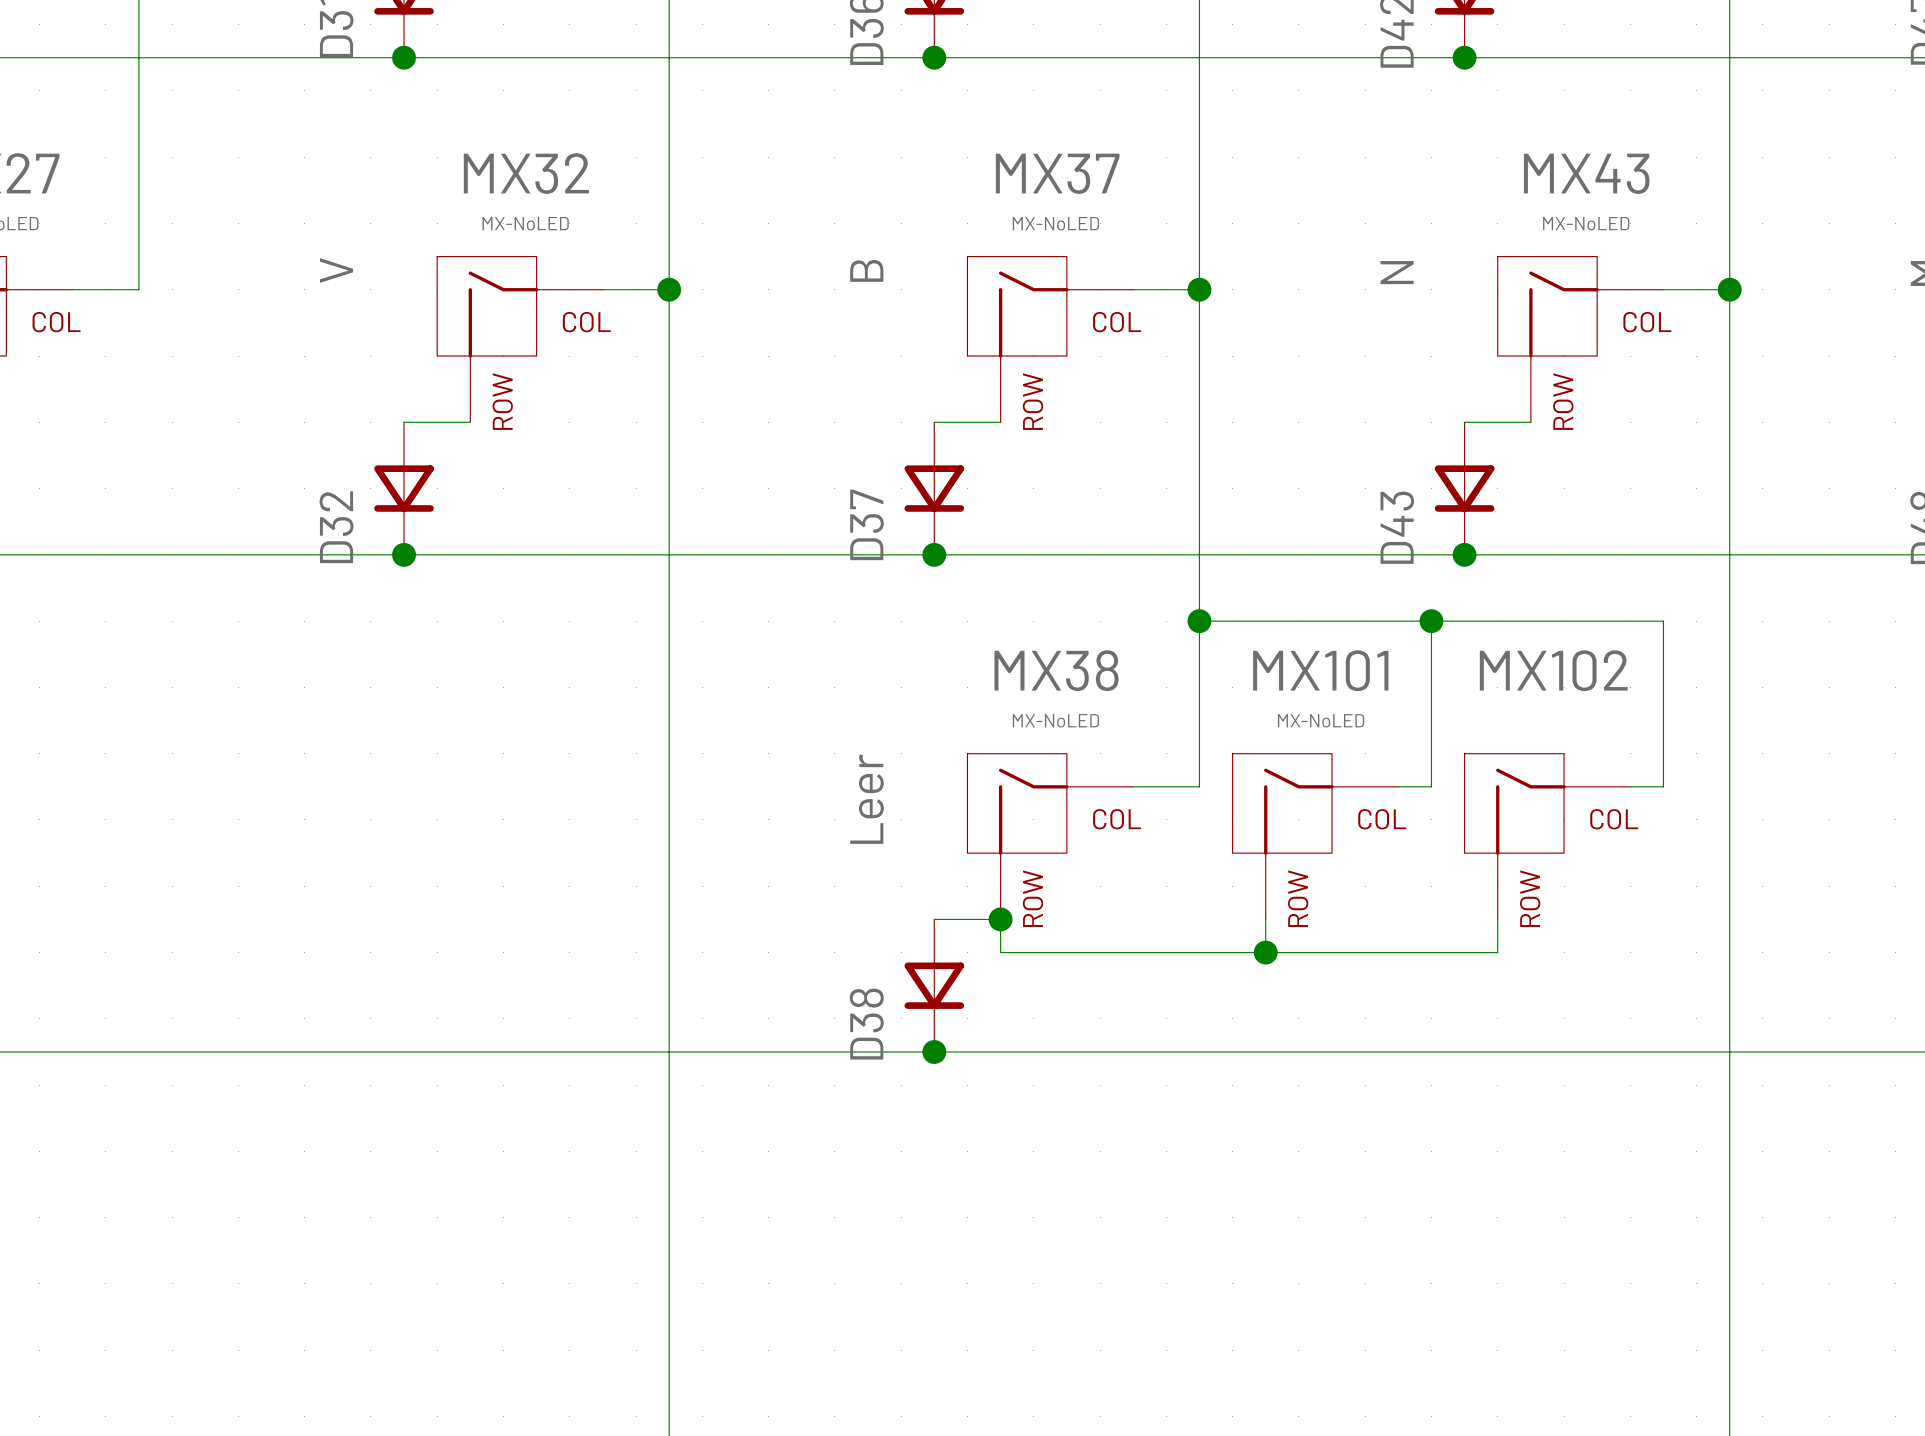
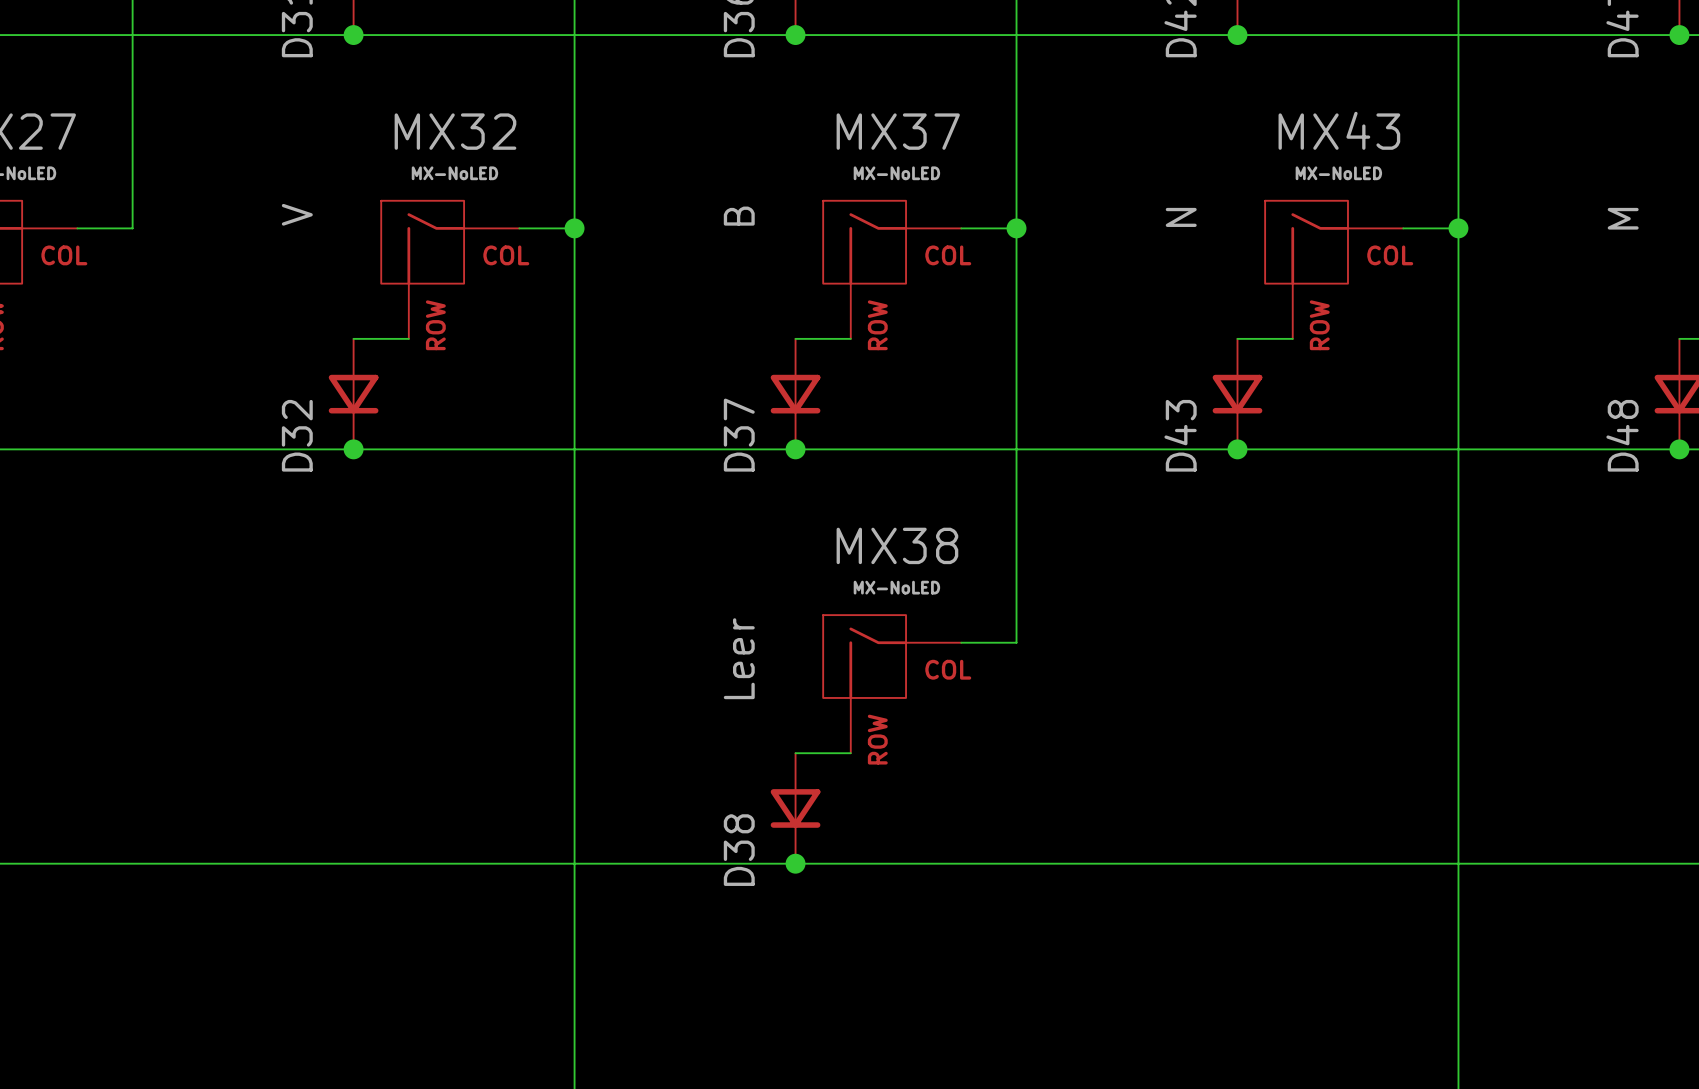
wire: (1199, 621) (1663, 621) (1663, 786) (1630, 786) -> none
junction: (1199, 621) -> none
wire: (1431, 621) (1431, 786) (1398, 786) -> none
junction: (1431, 621) -> none
MX101: MX-NoLED (1315, 836) -> none
MX102: (1547, 836) -> none
wire: (1000, 919) (1000, 952) (1497, 952) (1497, 919) -> none
junction: (1000, 919) -> none
wire: (1265, 919) (1265, 952) -> none
junction: (1265, 952) -> none

